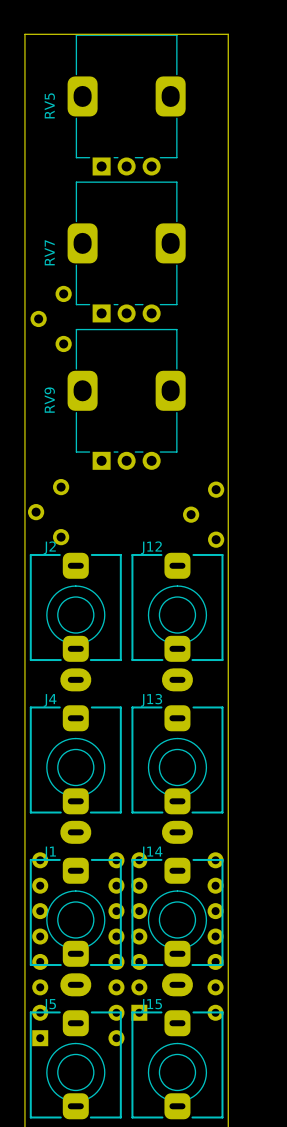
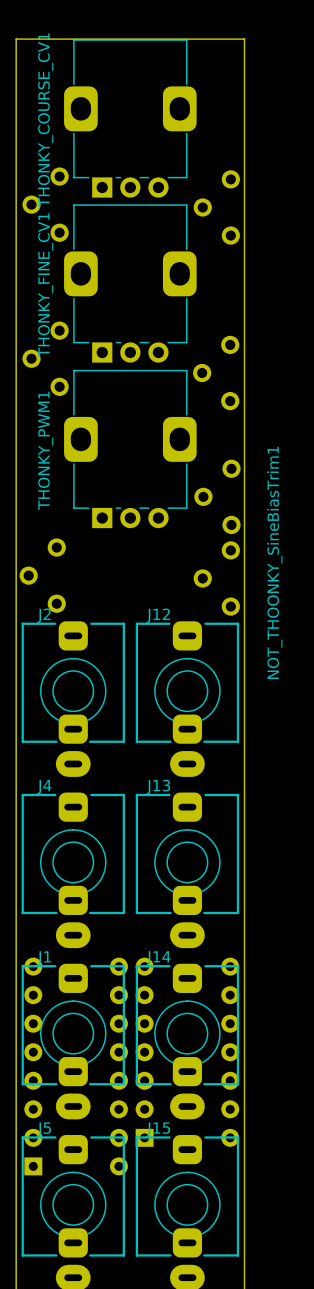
RV5 name: RV5 (49, 105) -> THONKY_COURSE_CV1 (45, 120)
part: none -> (45, 204)
part: none -> (216, 207)
RV7 name: RV7 (49, 252) -> THONKY_FINE_CV1 (45, 285)
part: none -> (216, 373)
RV9 name: RV9 (49, 400) -> THONKY_PWM1 (45, 450)
part: none -> (217, 496)
NOT_THOONKY_SineBiasTrim1 name: none -> NOT_THOONKY_SineBiasTrim1 (274, 562)

